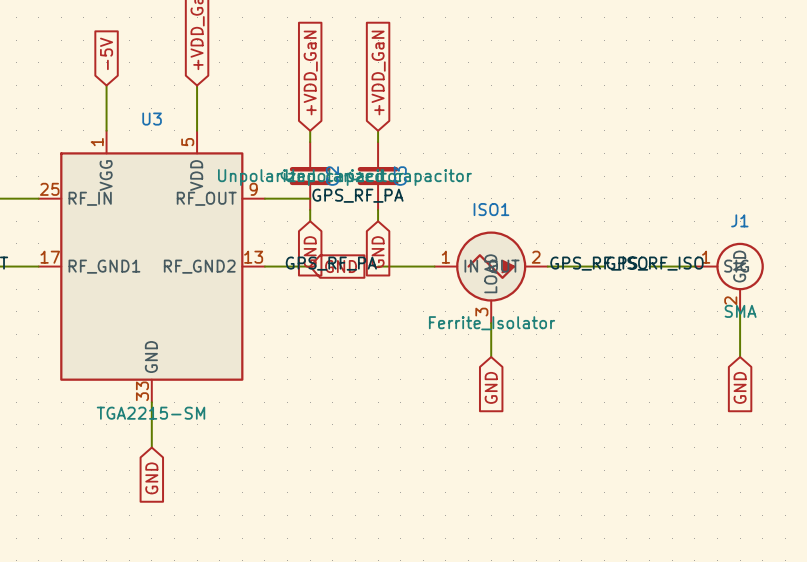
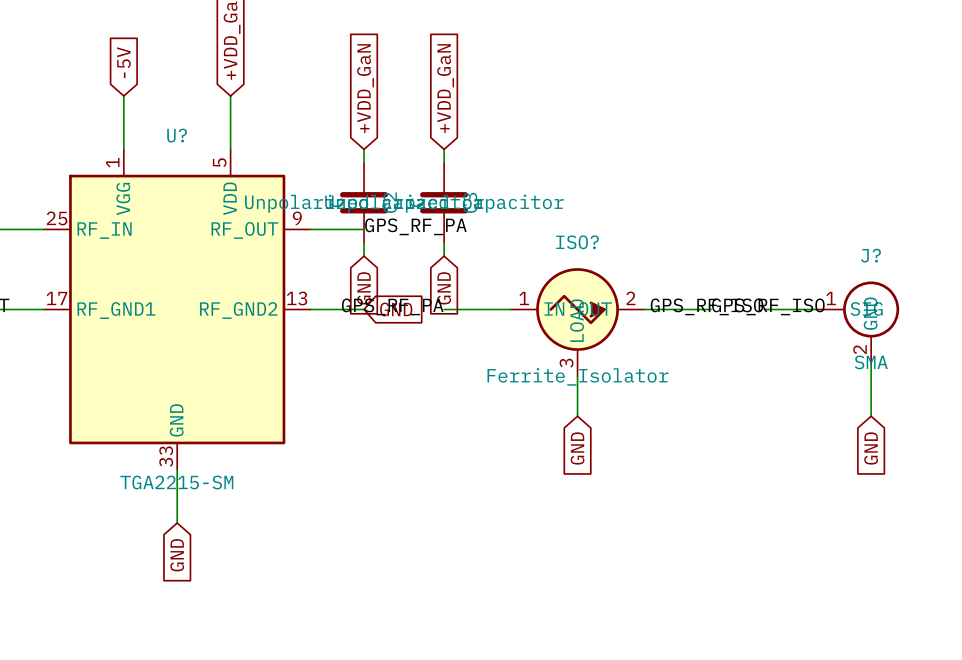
U3 name: U3 (152, 119) -> U? (177, 135)
ISO1 name: ISO1 (491, 209) -> ISO? (577, 242)
J1 name: J1 (739, 220) -> J? (870, 255)

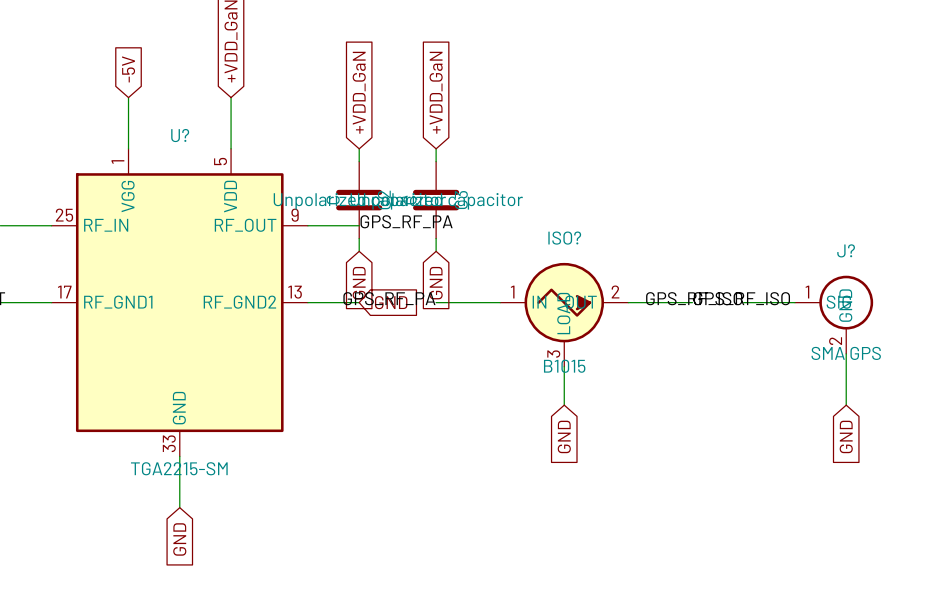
J? value: SMA (871, 362) -> SMA GPS (846, 353)
ISO? value: Ferrite_Isolator (578, 376) -> B1015 (564, 366)

